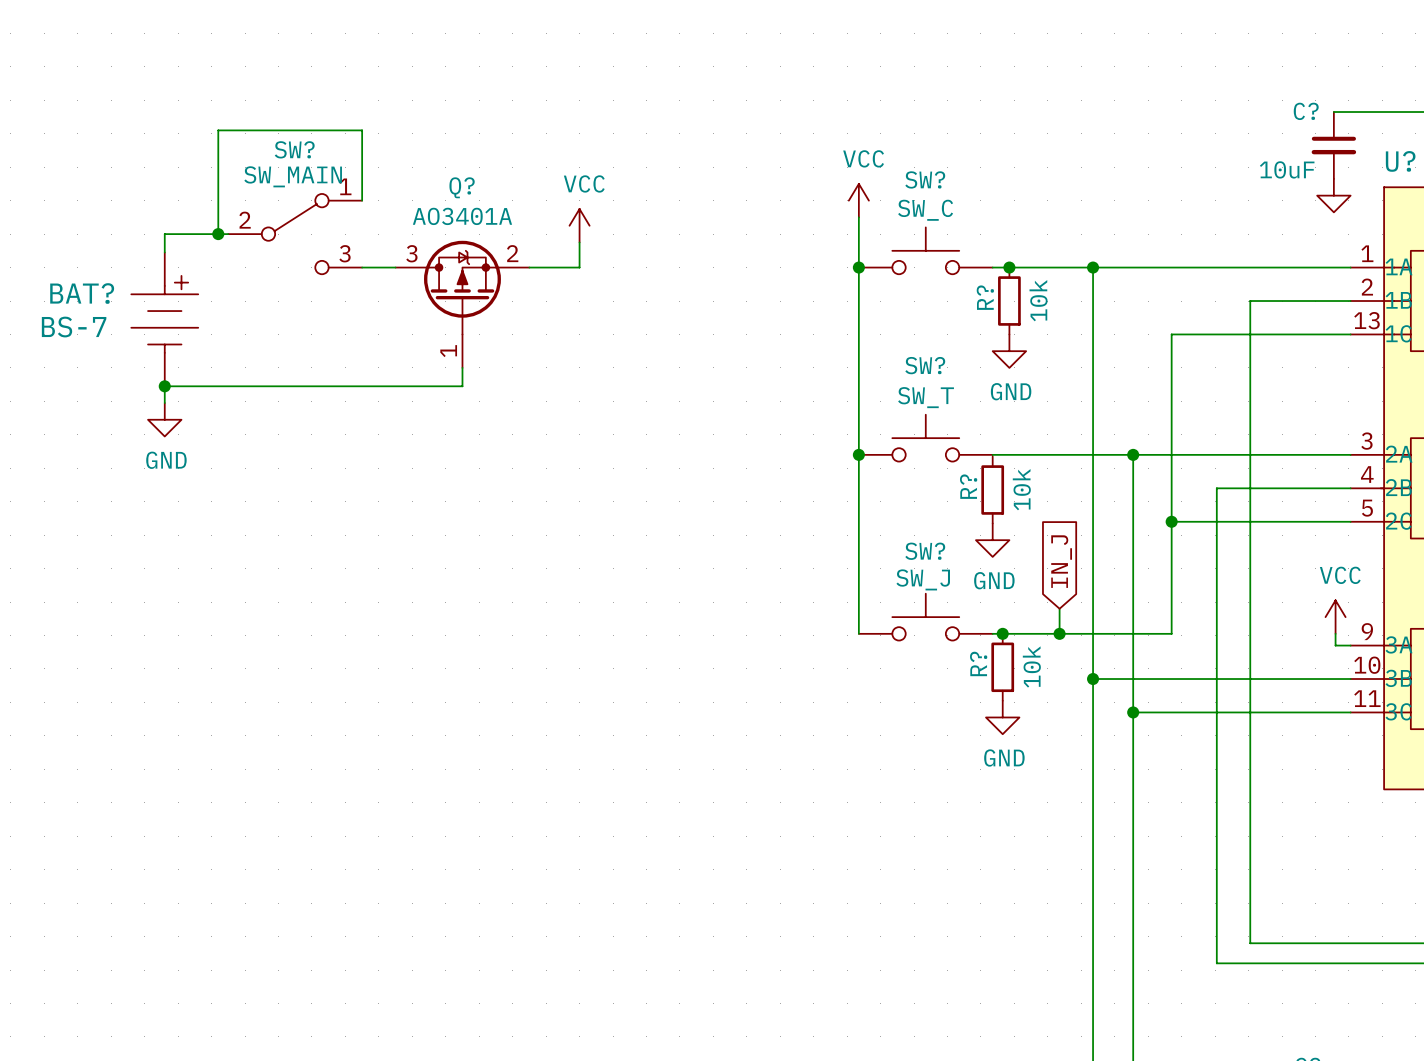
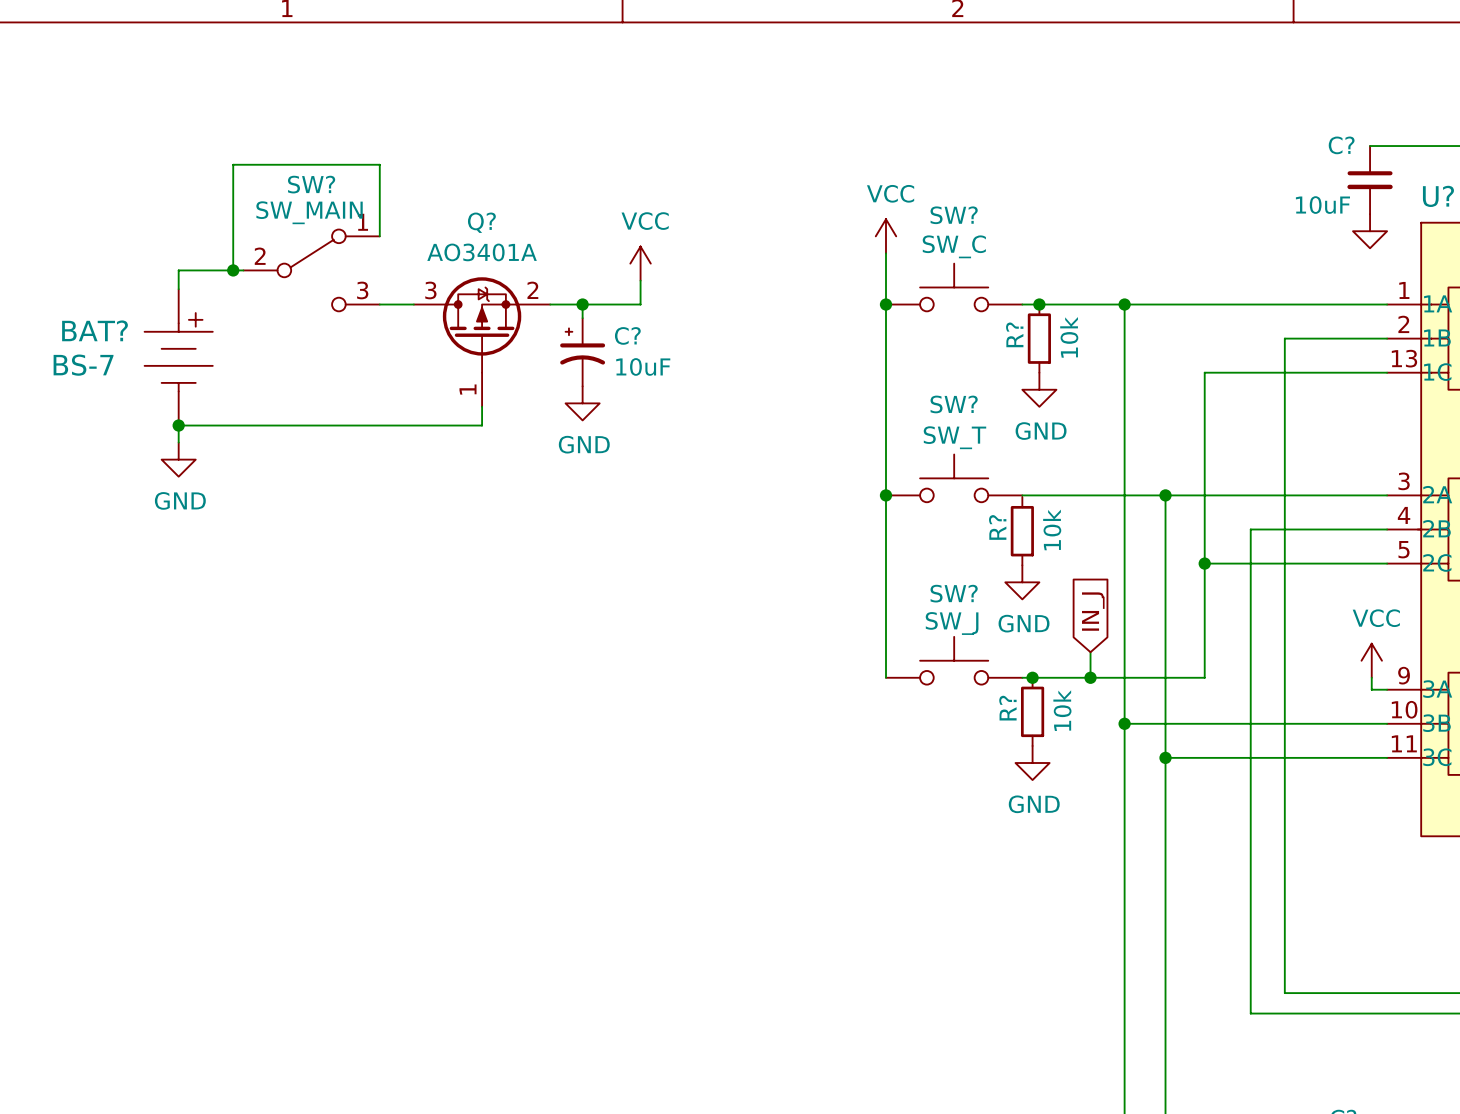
power symbol position: VCC (579, 225) -> VCC (640, 263)
wire: (579, 242) (579, 267) -> (640, 280) (640, 304) (601, 304)
wire: none -> (582, 304) (582, 318)
junction: none -> (582, 304)
C?: none -> 10uF (582, 352)
power symbol: none -> GND (582, 403)

